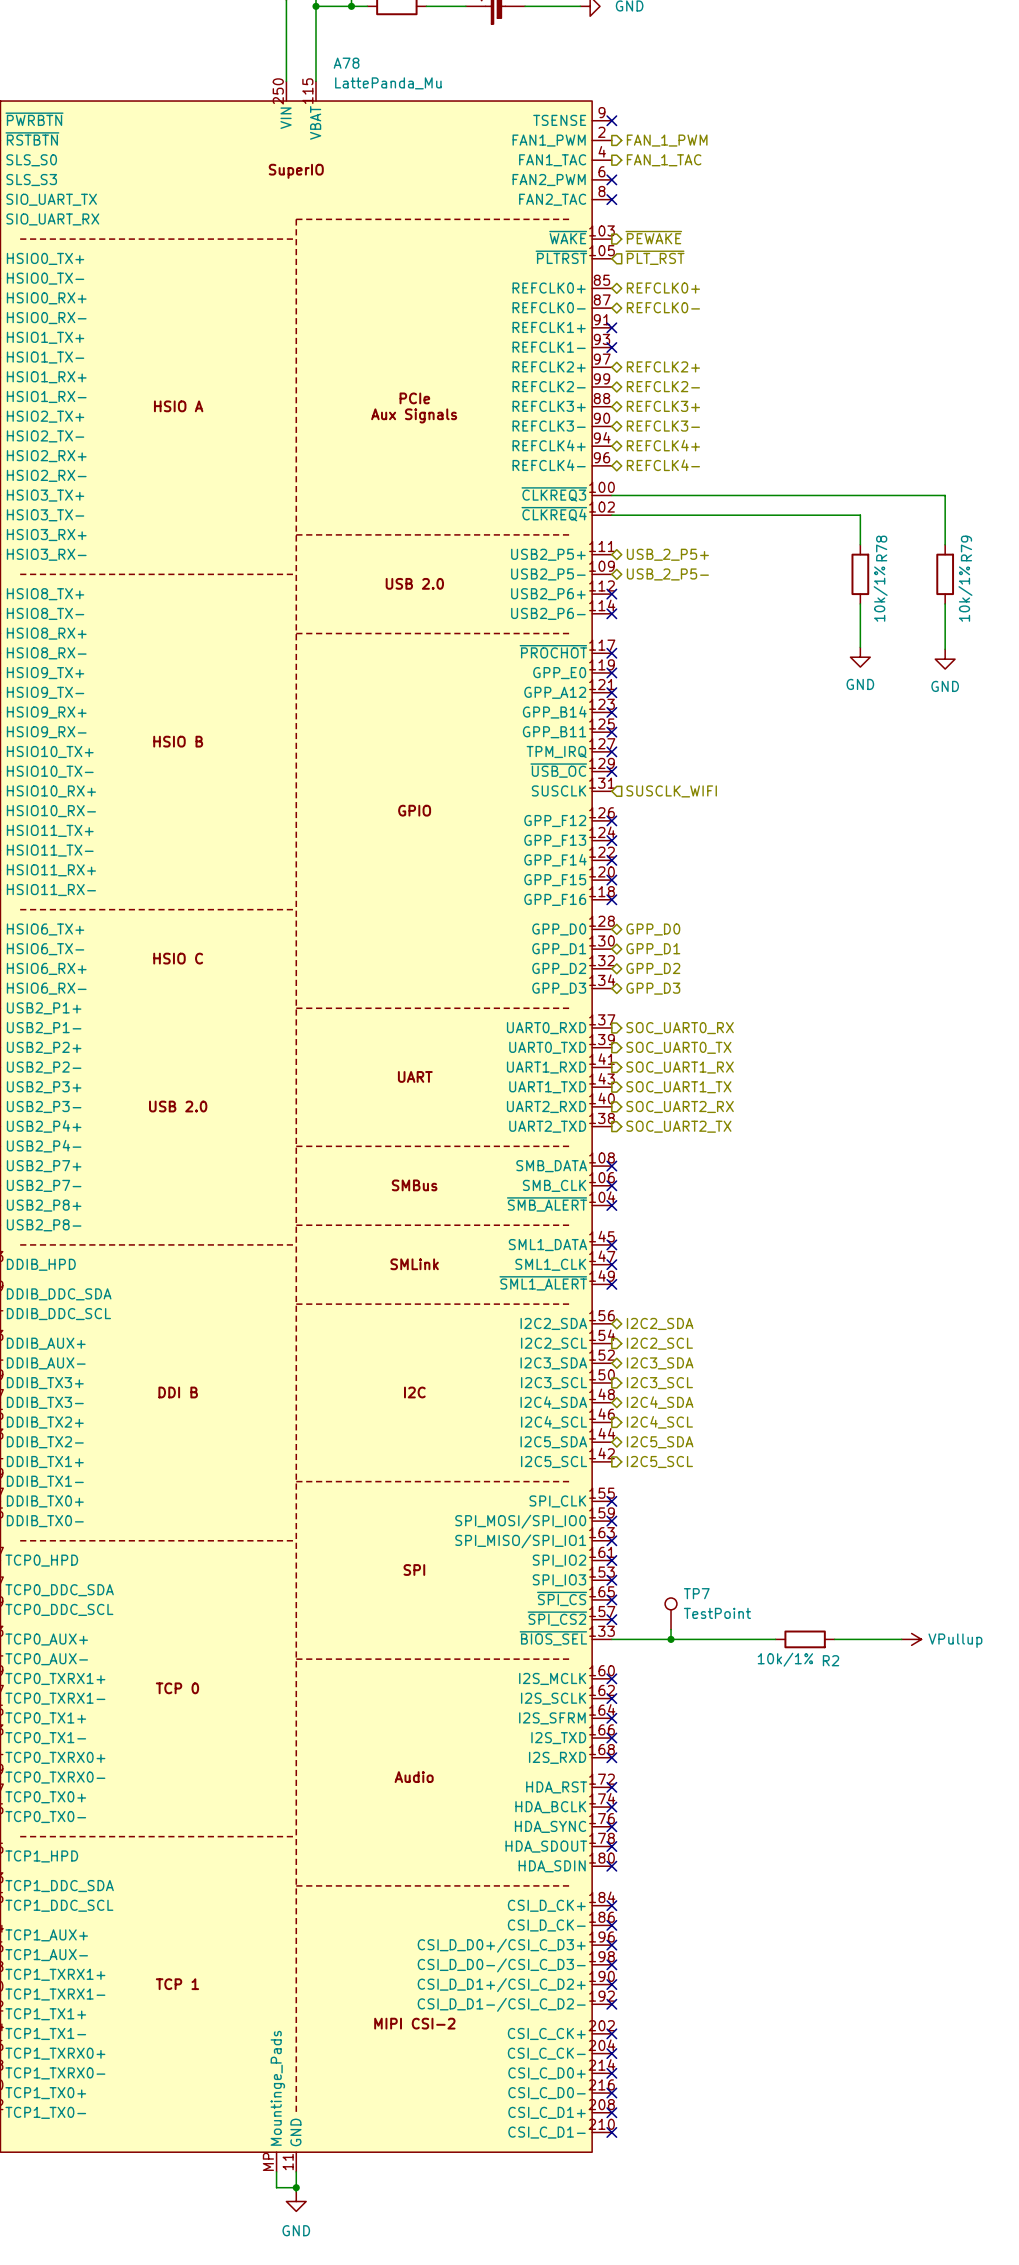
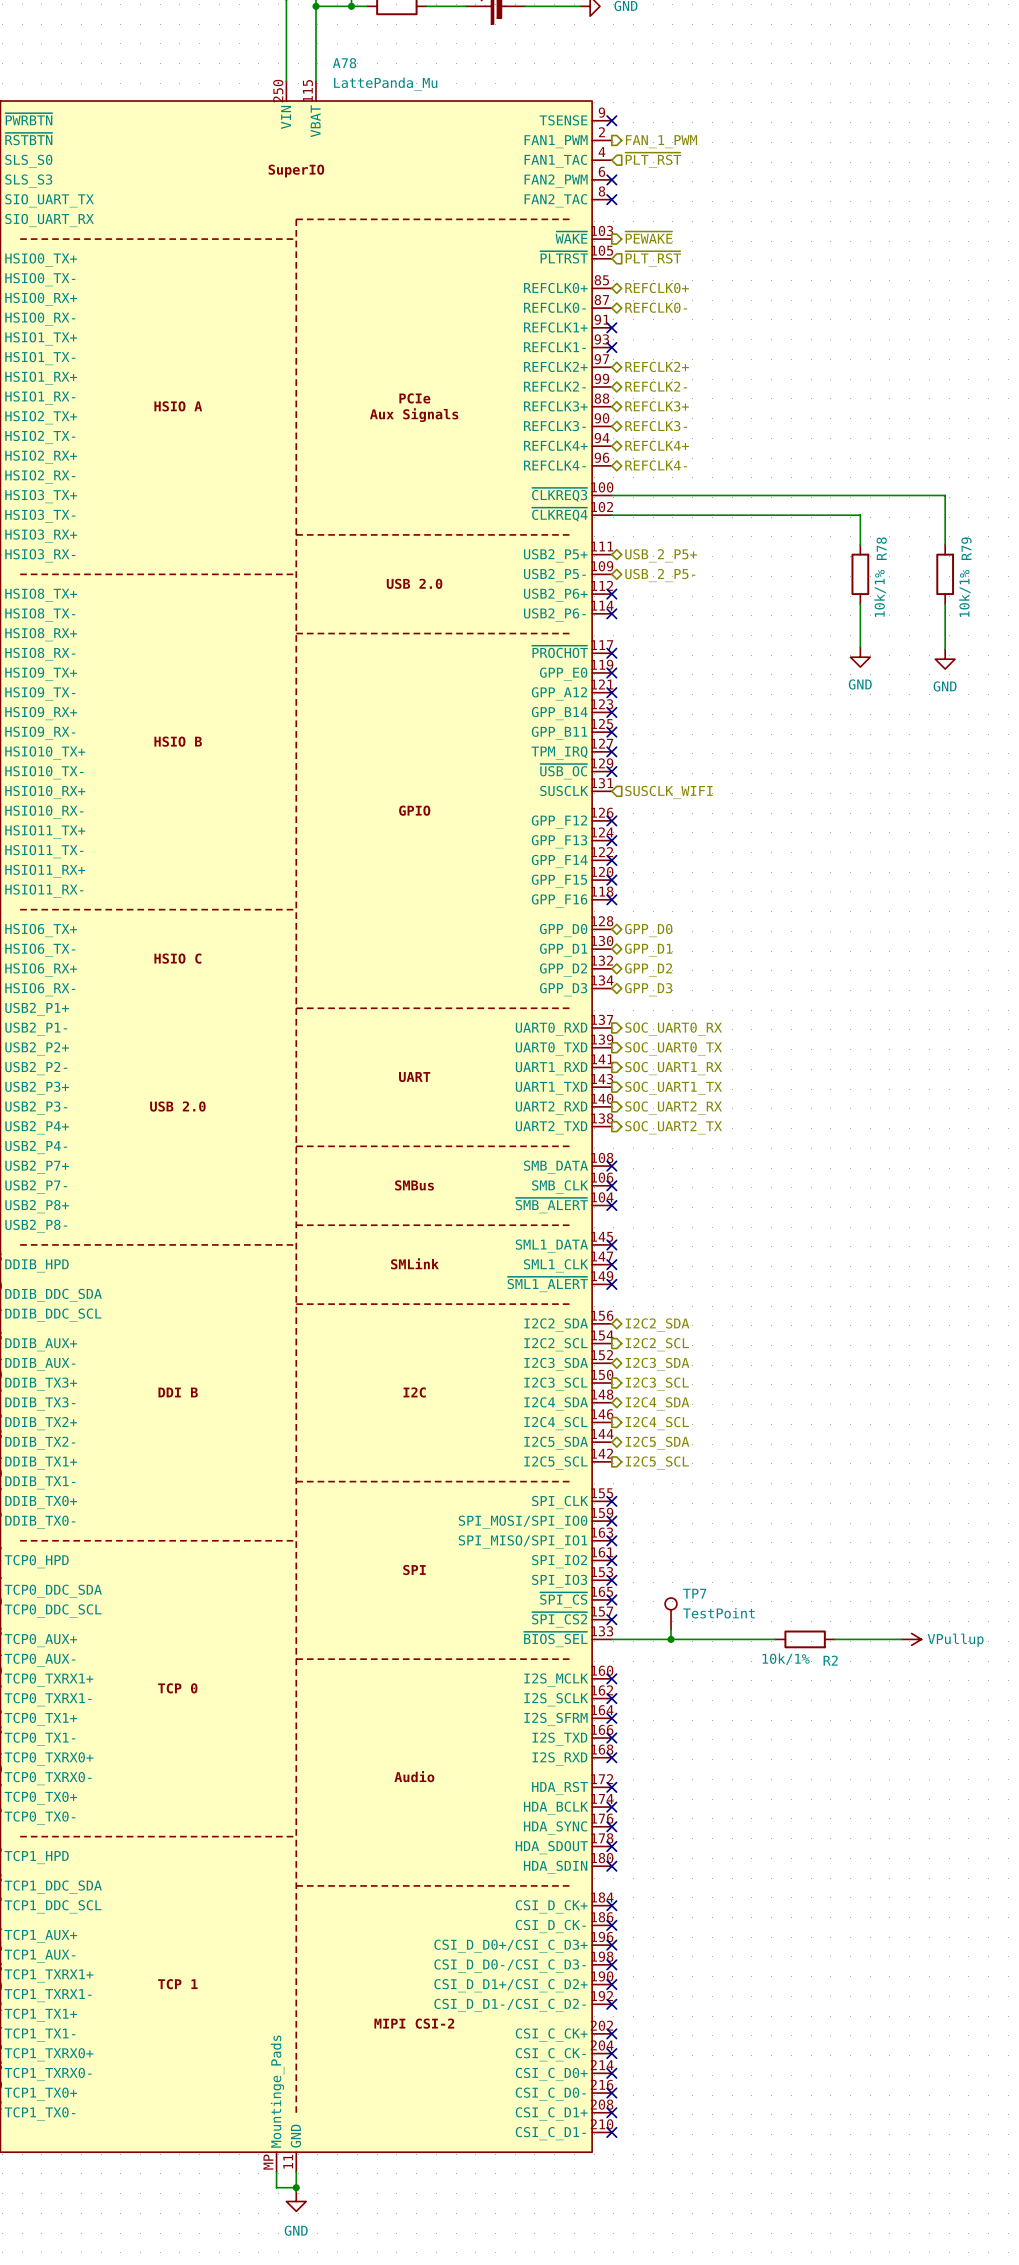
hierarchical label shape: output (664, 160) -> input (653, 160)
hierarchical label: FAN_1_TAC (664, 160) -> ~{PLT_RST} (653, 160)

